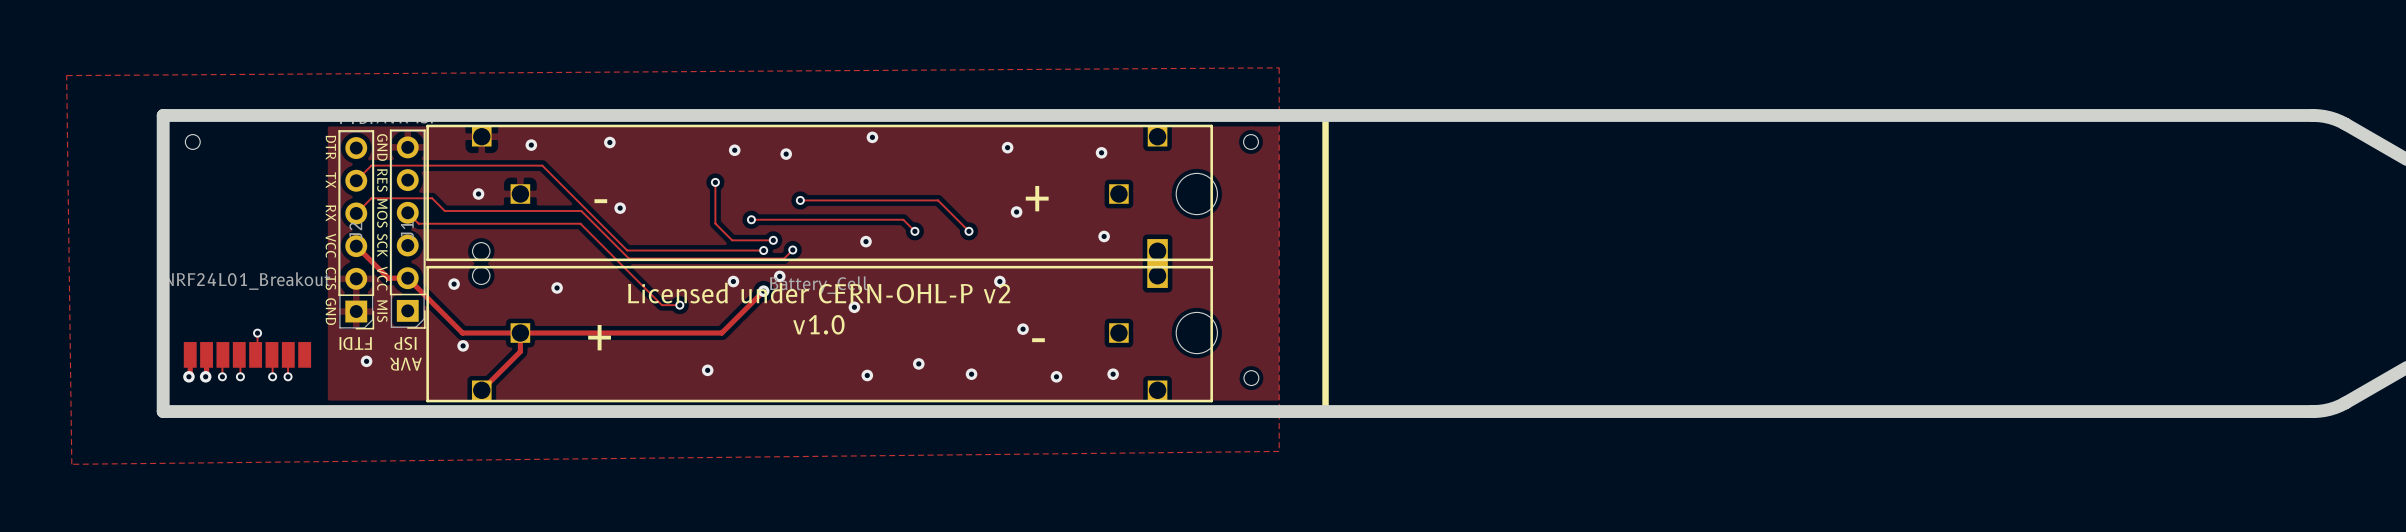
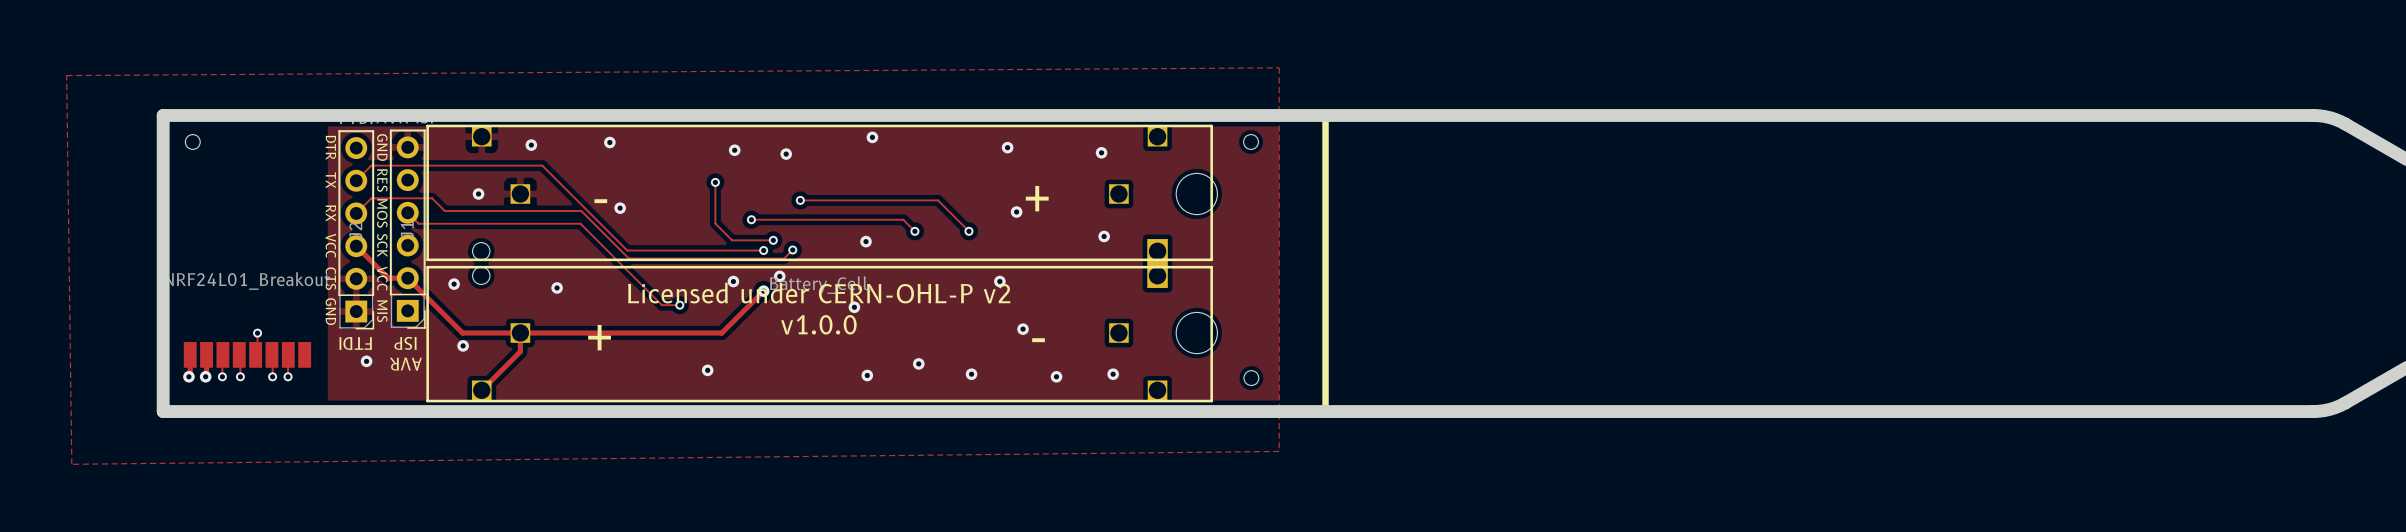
text: v1.0 (818, 324) -> v1.0.0 (818, 324)

